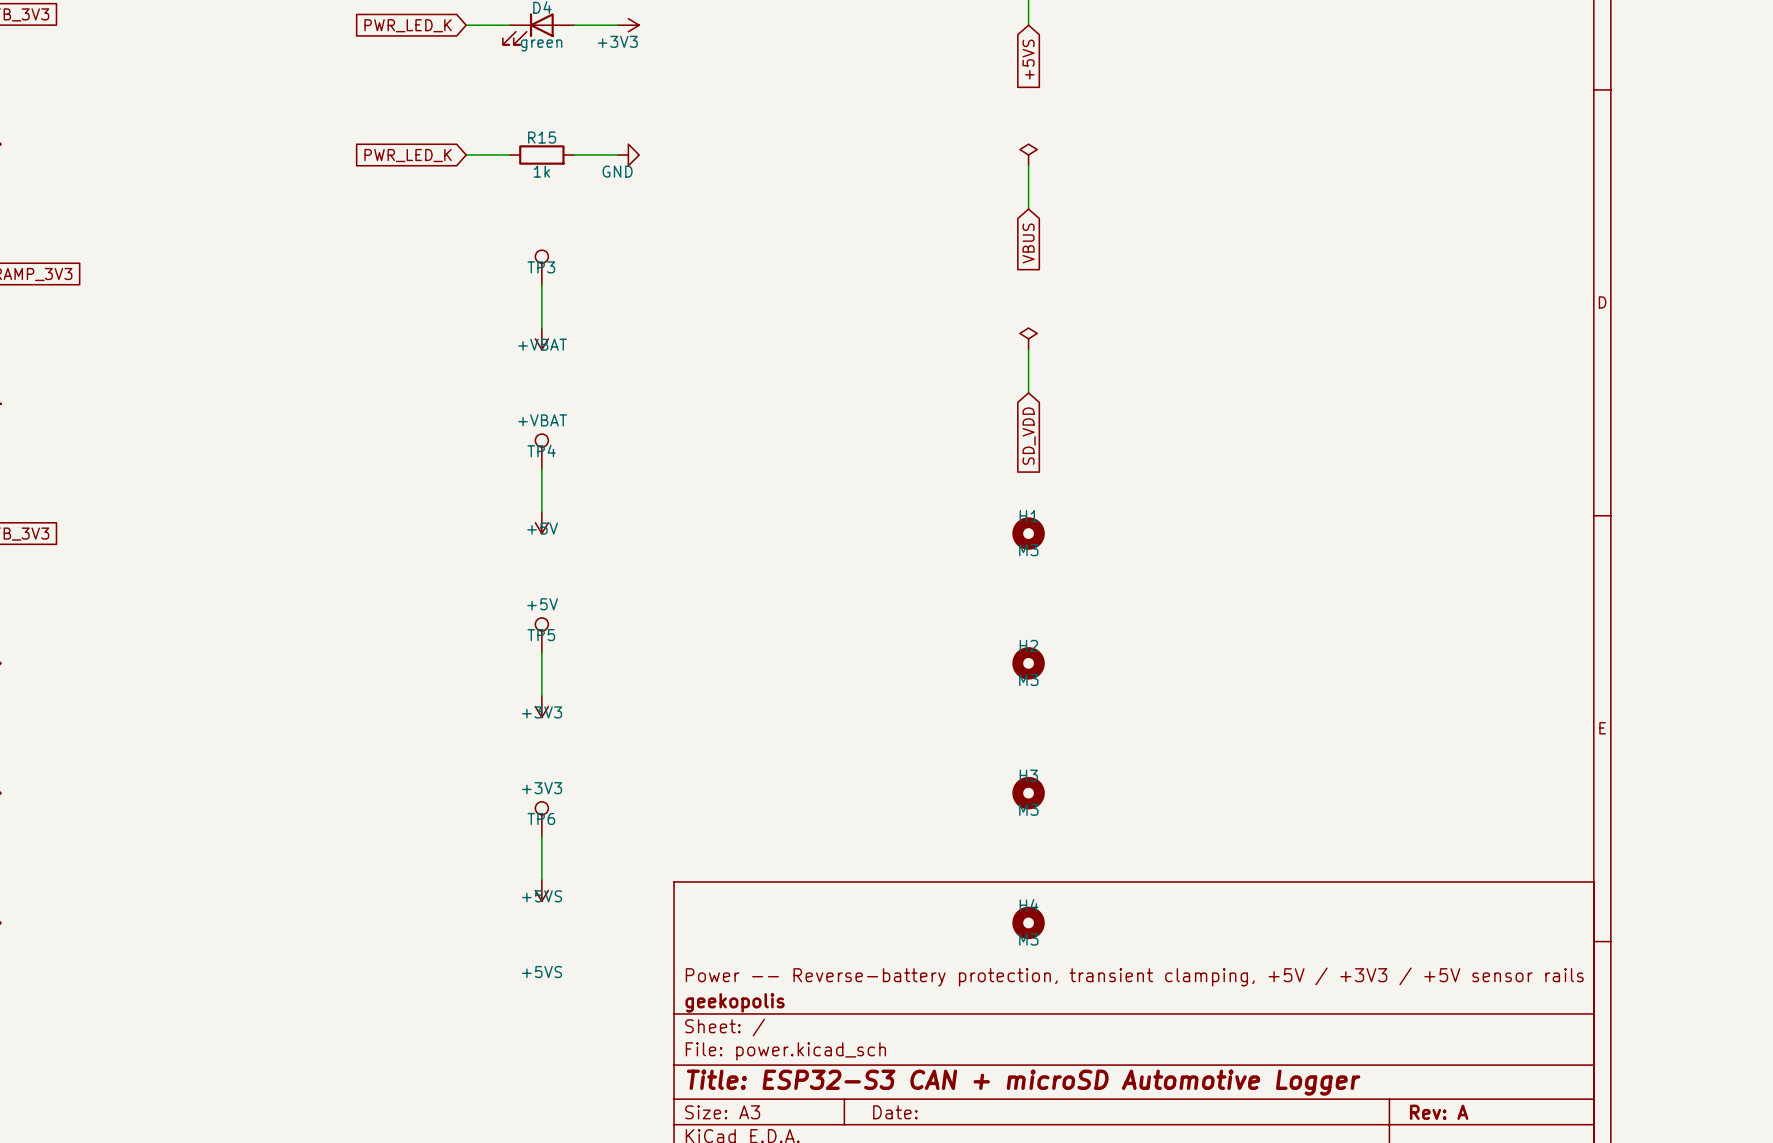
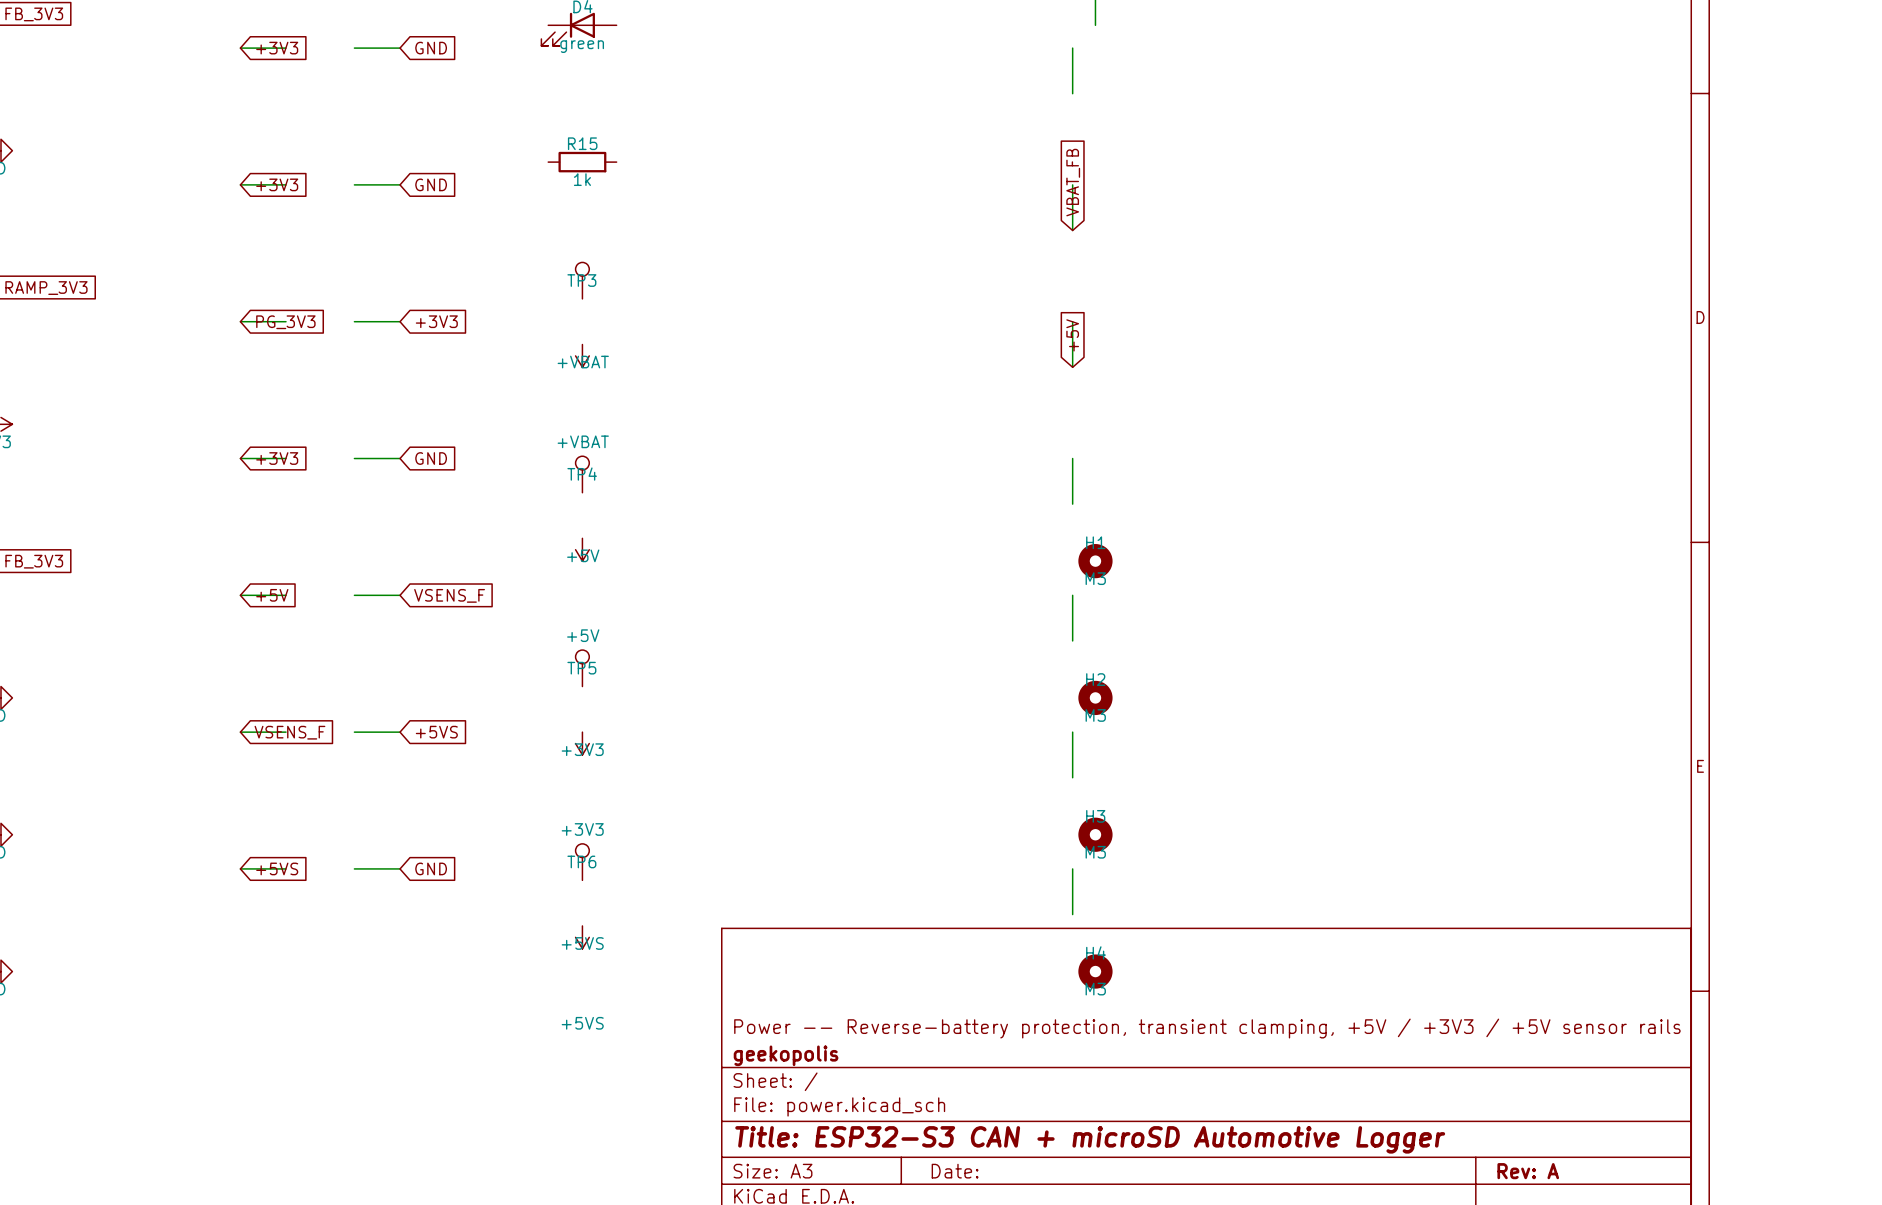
global label: PWR_LED_K (408, 25) -> none
wire: (466, 25) (509, 25) -> (354, 48) (400, 48)
wire: (574, 25) (617, 25) -> none
power symbol: +3V3 (628, 25) -> none
wire: none -> (240, 48) (286, 48)
global label: none -> +3V3 (277, 48)
global label: none -> GND (431, 48)
wire: none -> (1072, 48) (1072, 93)
global label: +5VS (1028, 59) -> none
global label: PWR_LED_K (408, 155) -> none
wire: (466, 155) (509, 155) -> (354, 184) (400, 184)
wire: (574, 155) (617, 155) -> none
power symbol: GND (628, 155) -> none
power symbol: (1028, 155) -> none
wire: (1028, 165) (1028, 209) -> (1072, 184) (1072, 230)
global label: none -> VBAT_FB (1073, 182)
wire: none -> (240, 184) (286, 184)
global label: none -> +3V3 (277, 184)
global label: none -> GND (431, 184)
global label: VBUS (1028, 243) -> none
wire: (541, 284) (541, 328) -> none
wire: none -> (240, 321) (286, 321)
global label: none -> PG_3V3 (285, 322)
wire: none -> (354, 321) (400, 321)
global label: none -> +3V3 (436, 321)
global label: none -> +5V (1072, 335)
power symbol: (1028, 338) -> none
wire: (1028, 349) (1028, 392) -> (1072, 321) (1072, 367)
wire: none -> (240, 458) (286, 458)
global label: none -> +3V3 (277, 458)
wire: none -> (354, 458) (400, 458)
global label: none -> GND (431, 458)
wire: none -> (1072, 458) (1072, 504)
global label: SD_VDD (1029, 436) -> none
wire: (541, 468) (541, 511) -> none
wire: none -> (240, 595) (286, 595)
global label: none -> +5V (272, 595)
wire: none -> (354, 595) (400, 595)
global label: none -> VSENS_F (449, 595)
wire: none -> (1072, 595) (1072, 640)
wire: (541, 652) (541, 695) -> none
wire: none -> (240, 732) (286, 732)
wire: none -> (354, 732) (400, 732)
global label: none -> +5VS (436, 732)
wire: none -> (1072, 732) (1072, 777)
global label: none -> VSENS_F (289, 732)
wire: none -> (240, 868) (286, 868)
global label: none -> +5VS (277, 868)
wire: none -> (354, 868) (400, 868)
global label: none -> GND (431, 868)
wire: none -> (1072, 868) (1072, 914)
wire: (541, 836) (541, 879) -> none

